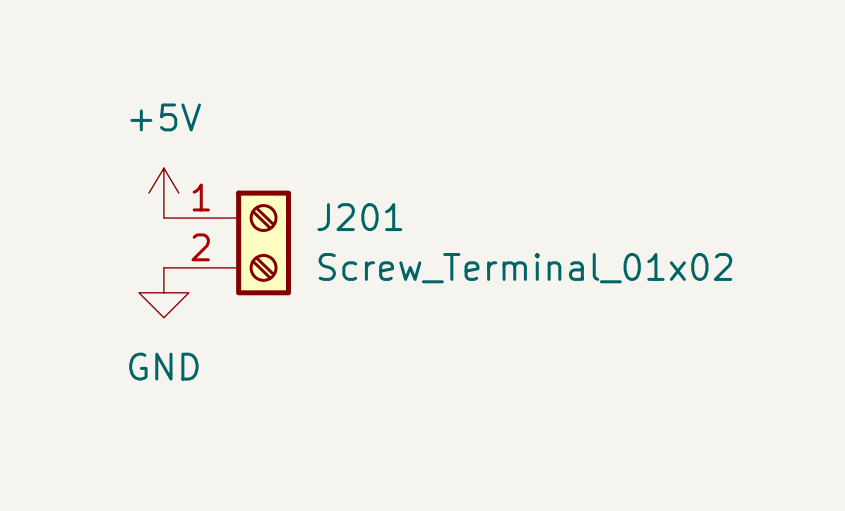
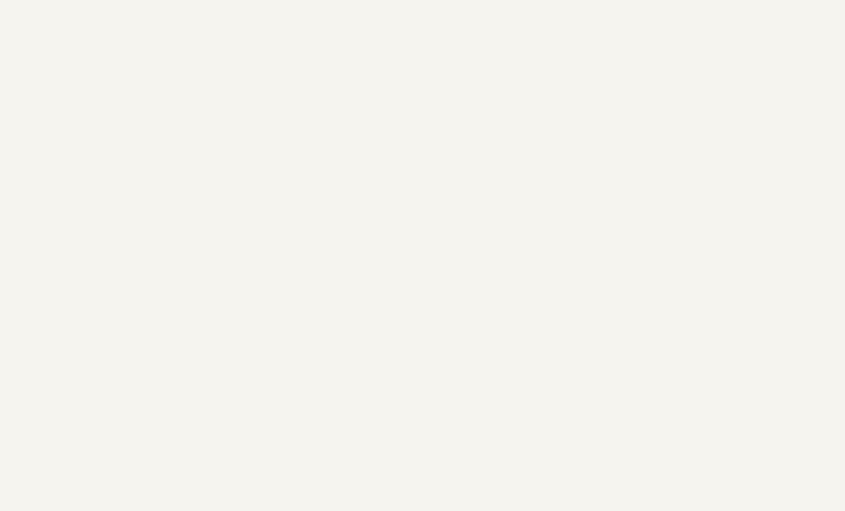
power symbol: +5V (163, 193) -> none
J201: Screw_Terminal_01x02 (227, 242) -> none
power symbol: GND (163, 292) -> none

